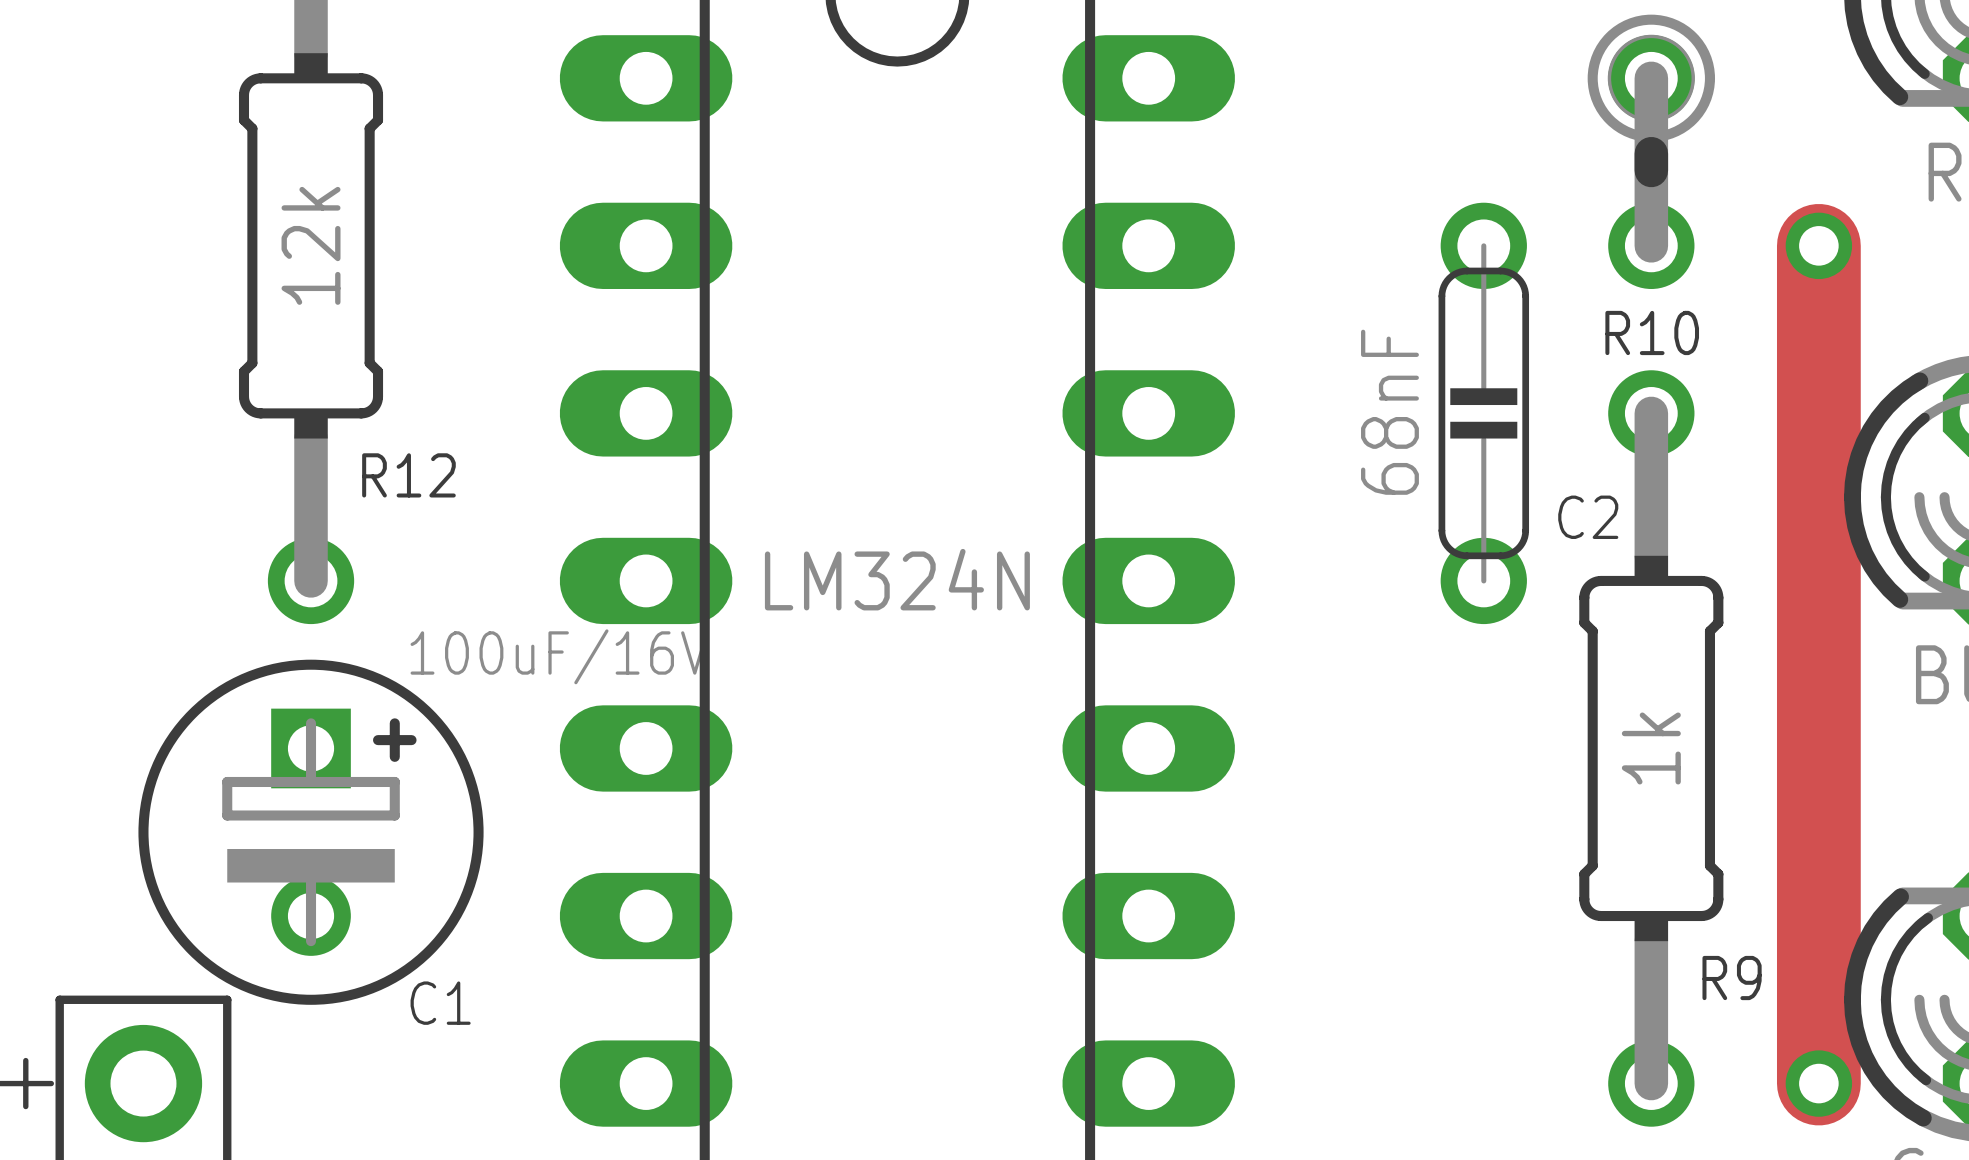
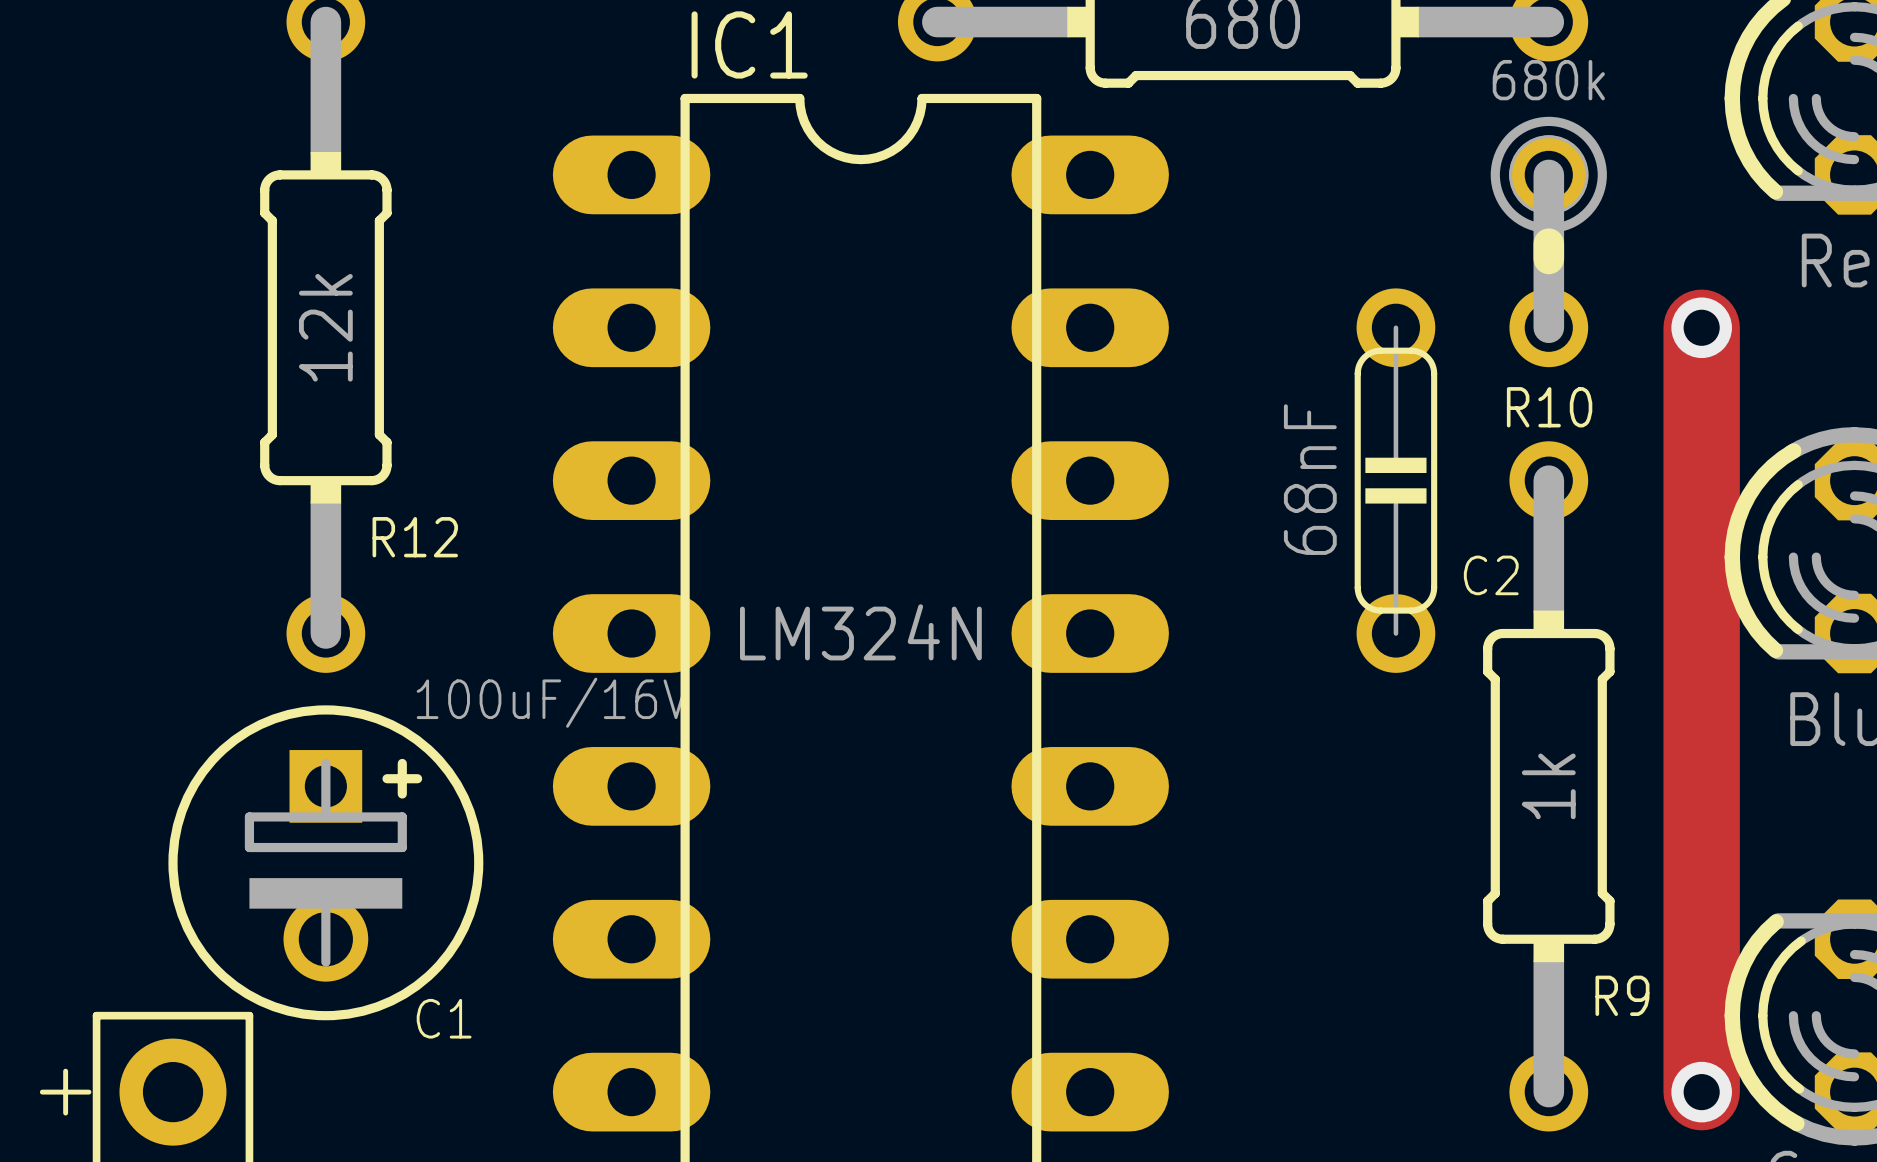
C1 footprint: [138, 659, 484, 1005] -> [168, 705, 484, 1021]

